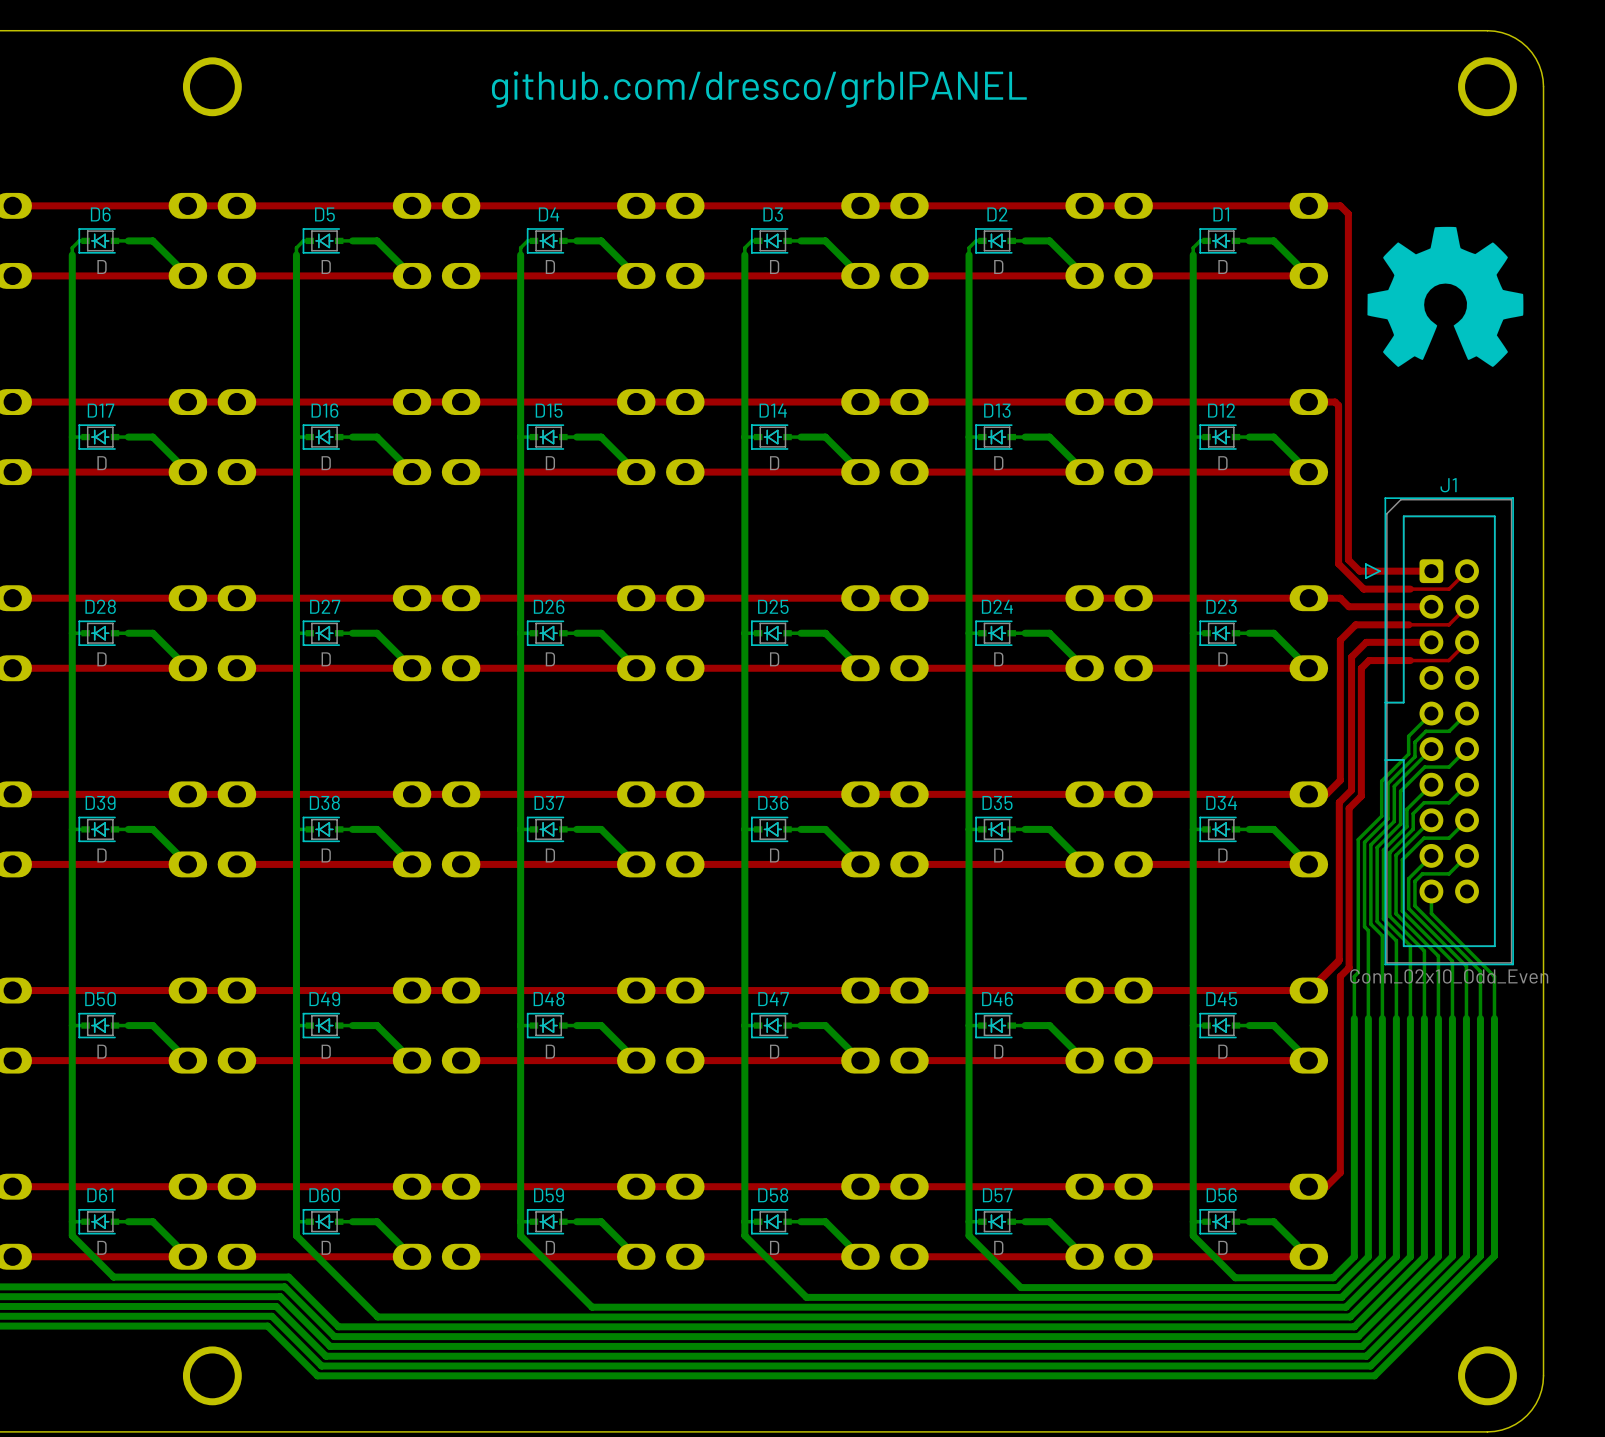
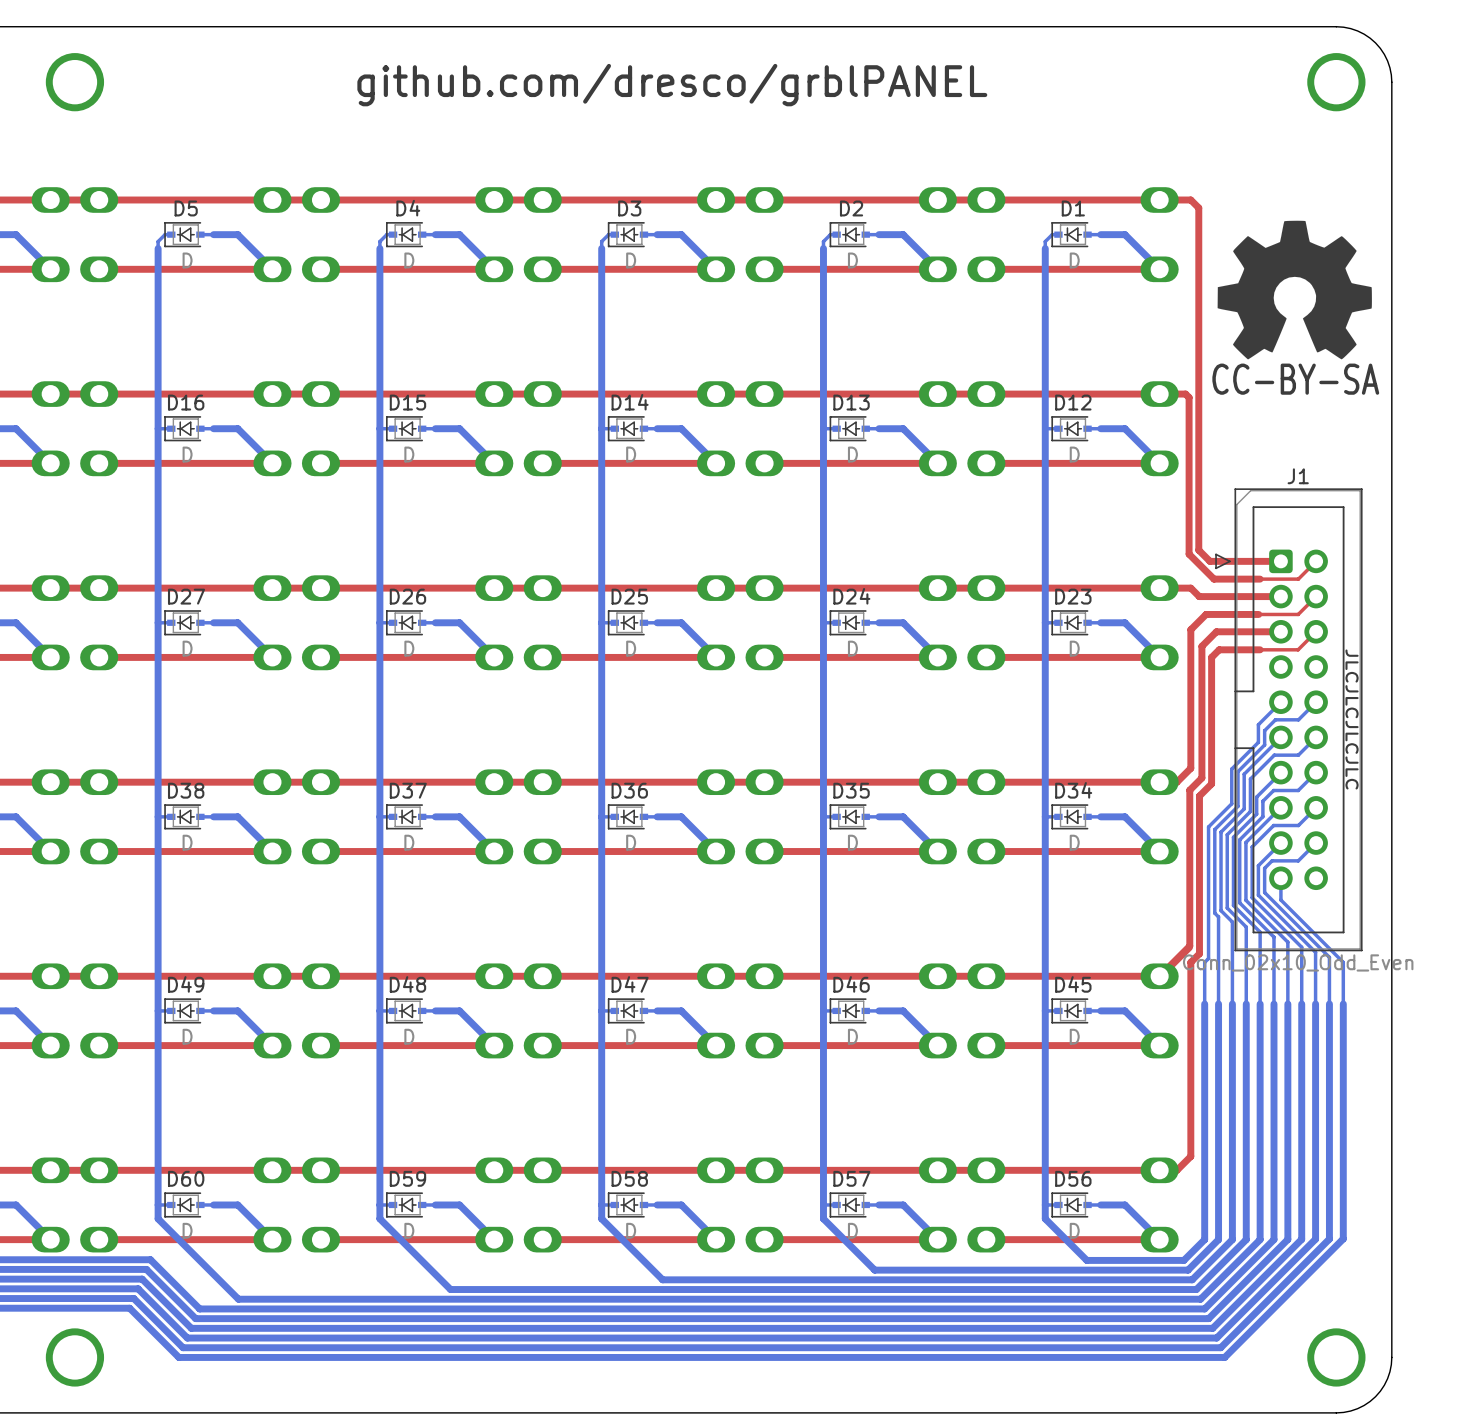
text position: github.com/dresco/grblPANEL (759, 89) -> github.com/dresco/grblPANEL (672, 85)
text: none -> CC-BY-SA (1295, 379)
text: none -> JLCJLCJLCJLC (1352, 719)

